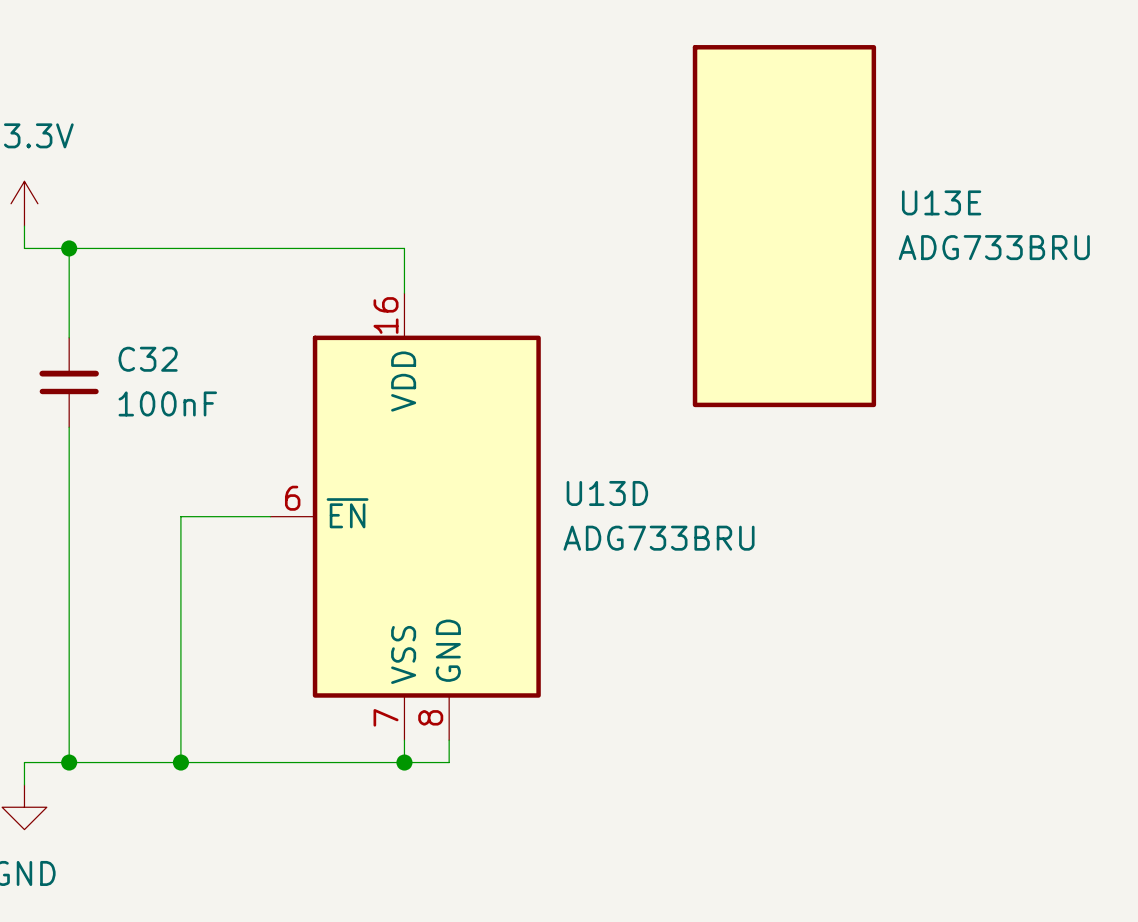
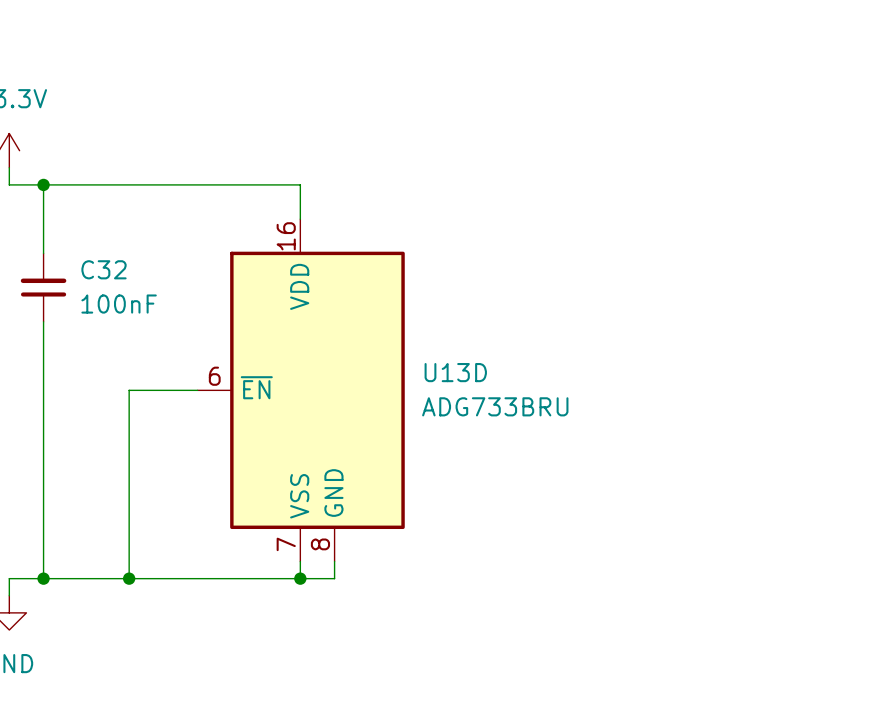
U13E: ADG733BRU (784, 226) -> none

